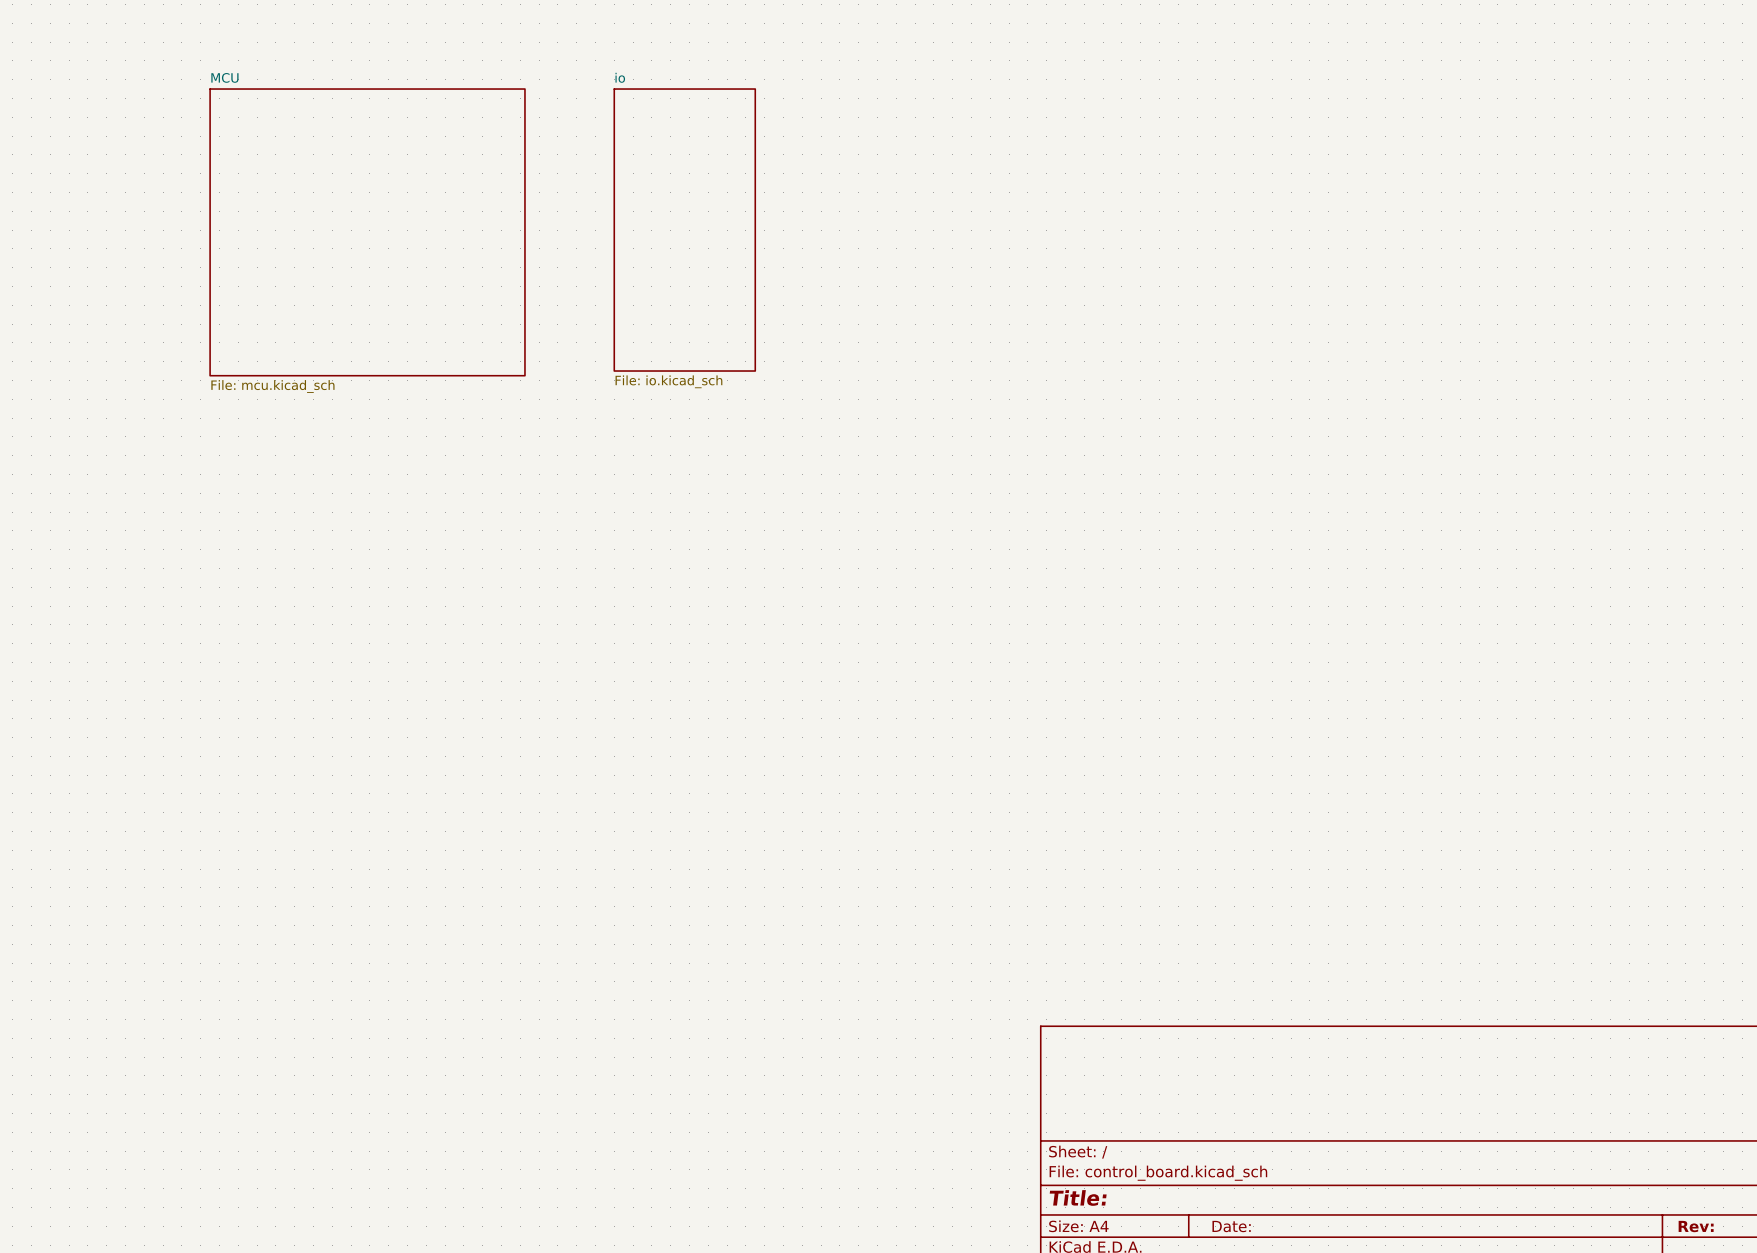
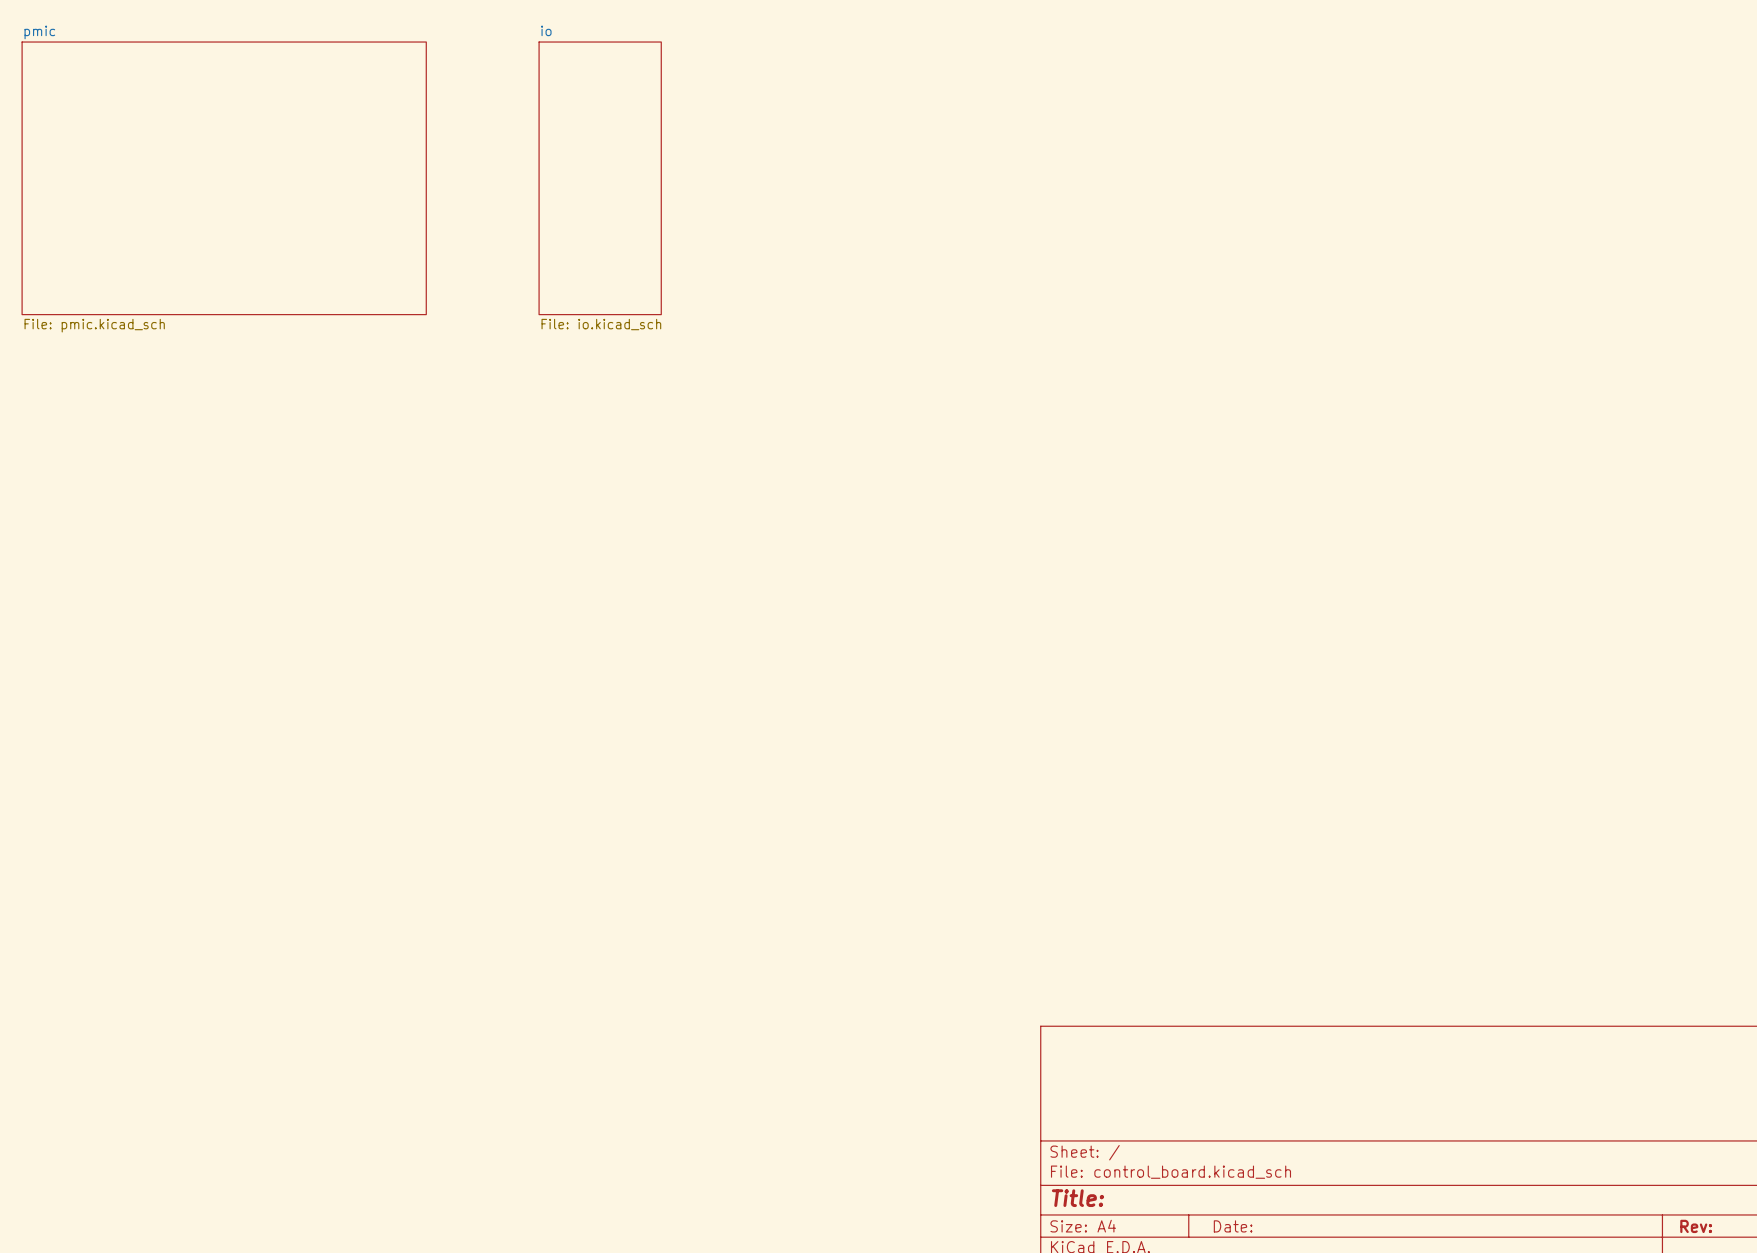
sheet pmic: none -> File: pmic.kicad_sch (224, 178)
sheet io: none -> File: io.kicad_sch (600, 178)
sheet io: File: io.kicad_sch (684, 230) -> none
sheet MCU: File: mcu.kicad_sch (367, 232) -> none

